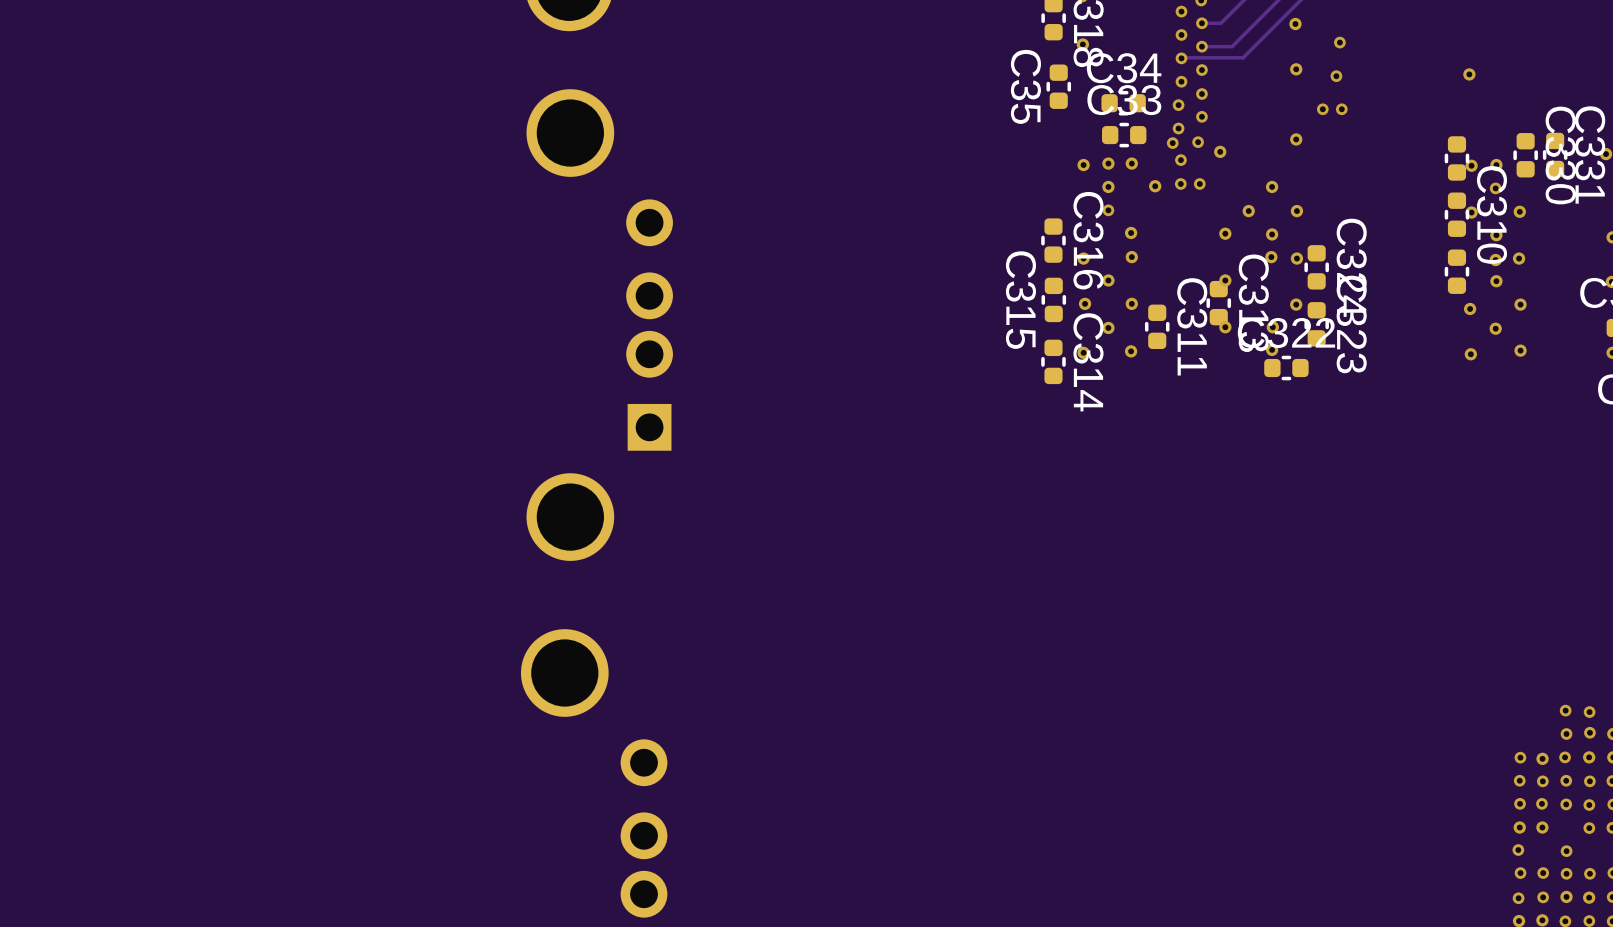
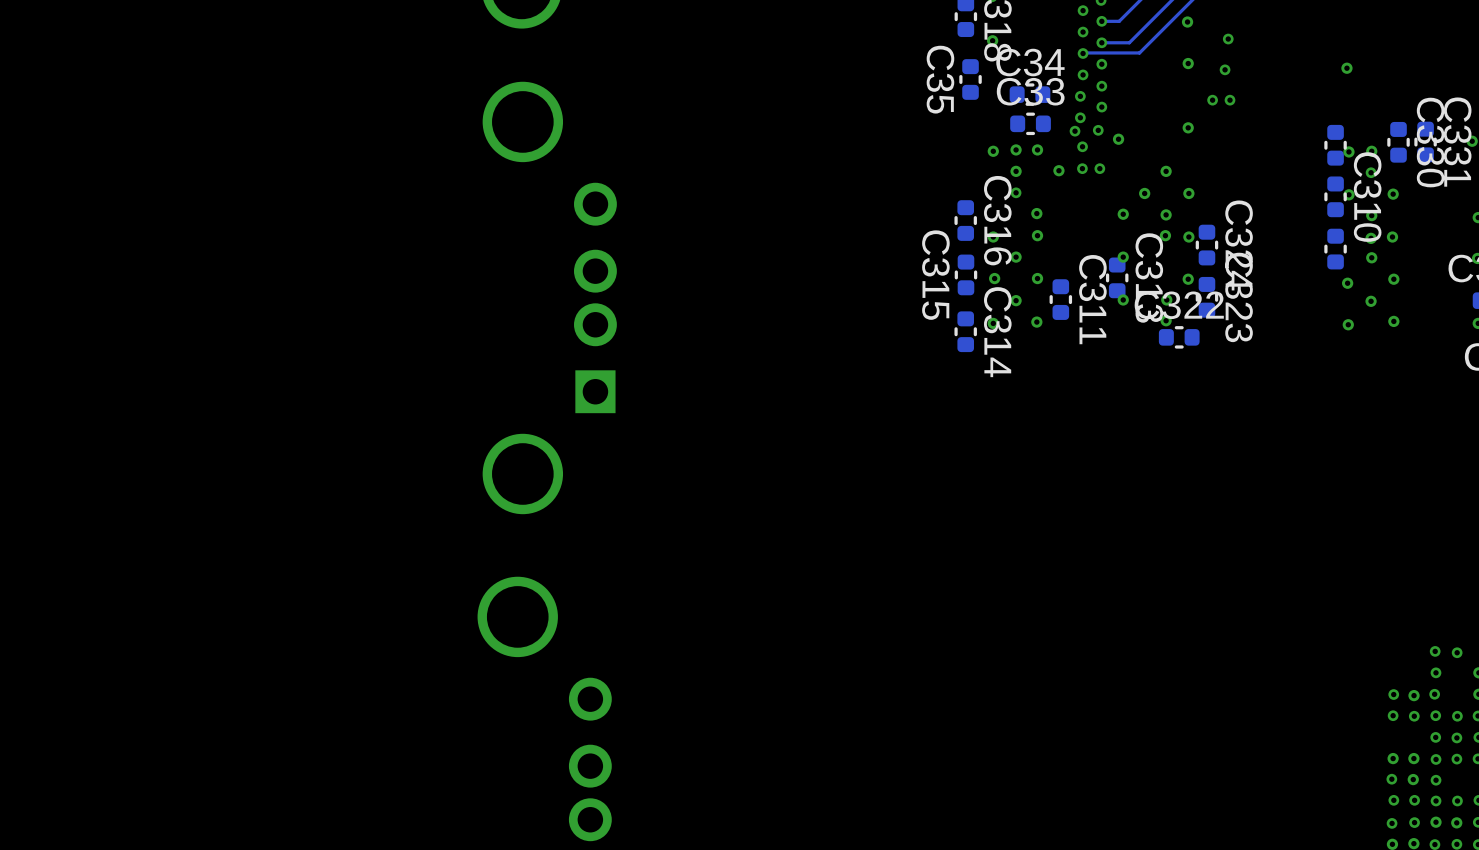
via: (1589, 732) -> none
via: (1589, 757) -> none
via: (1520, 803) -> none
via: (1541, 803) -> none
via: none -> (1436, 759)
via: none -> (1413, 779)

